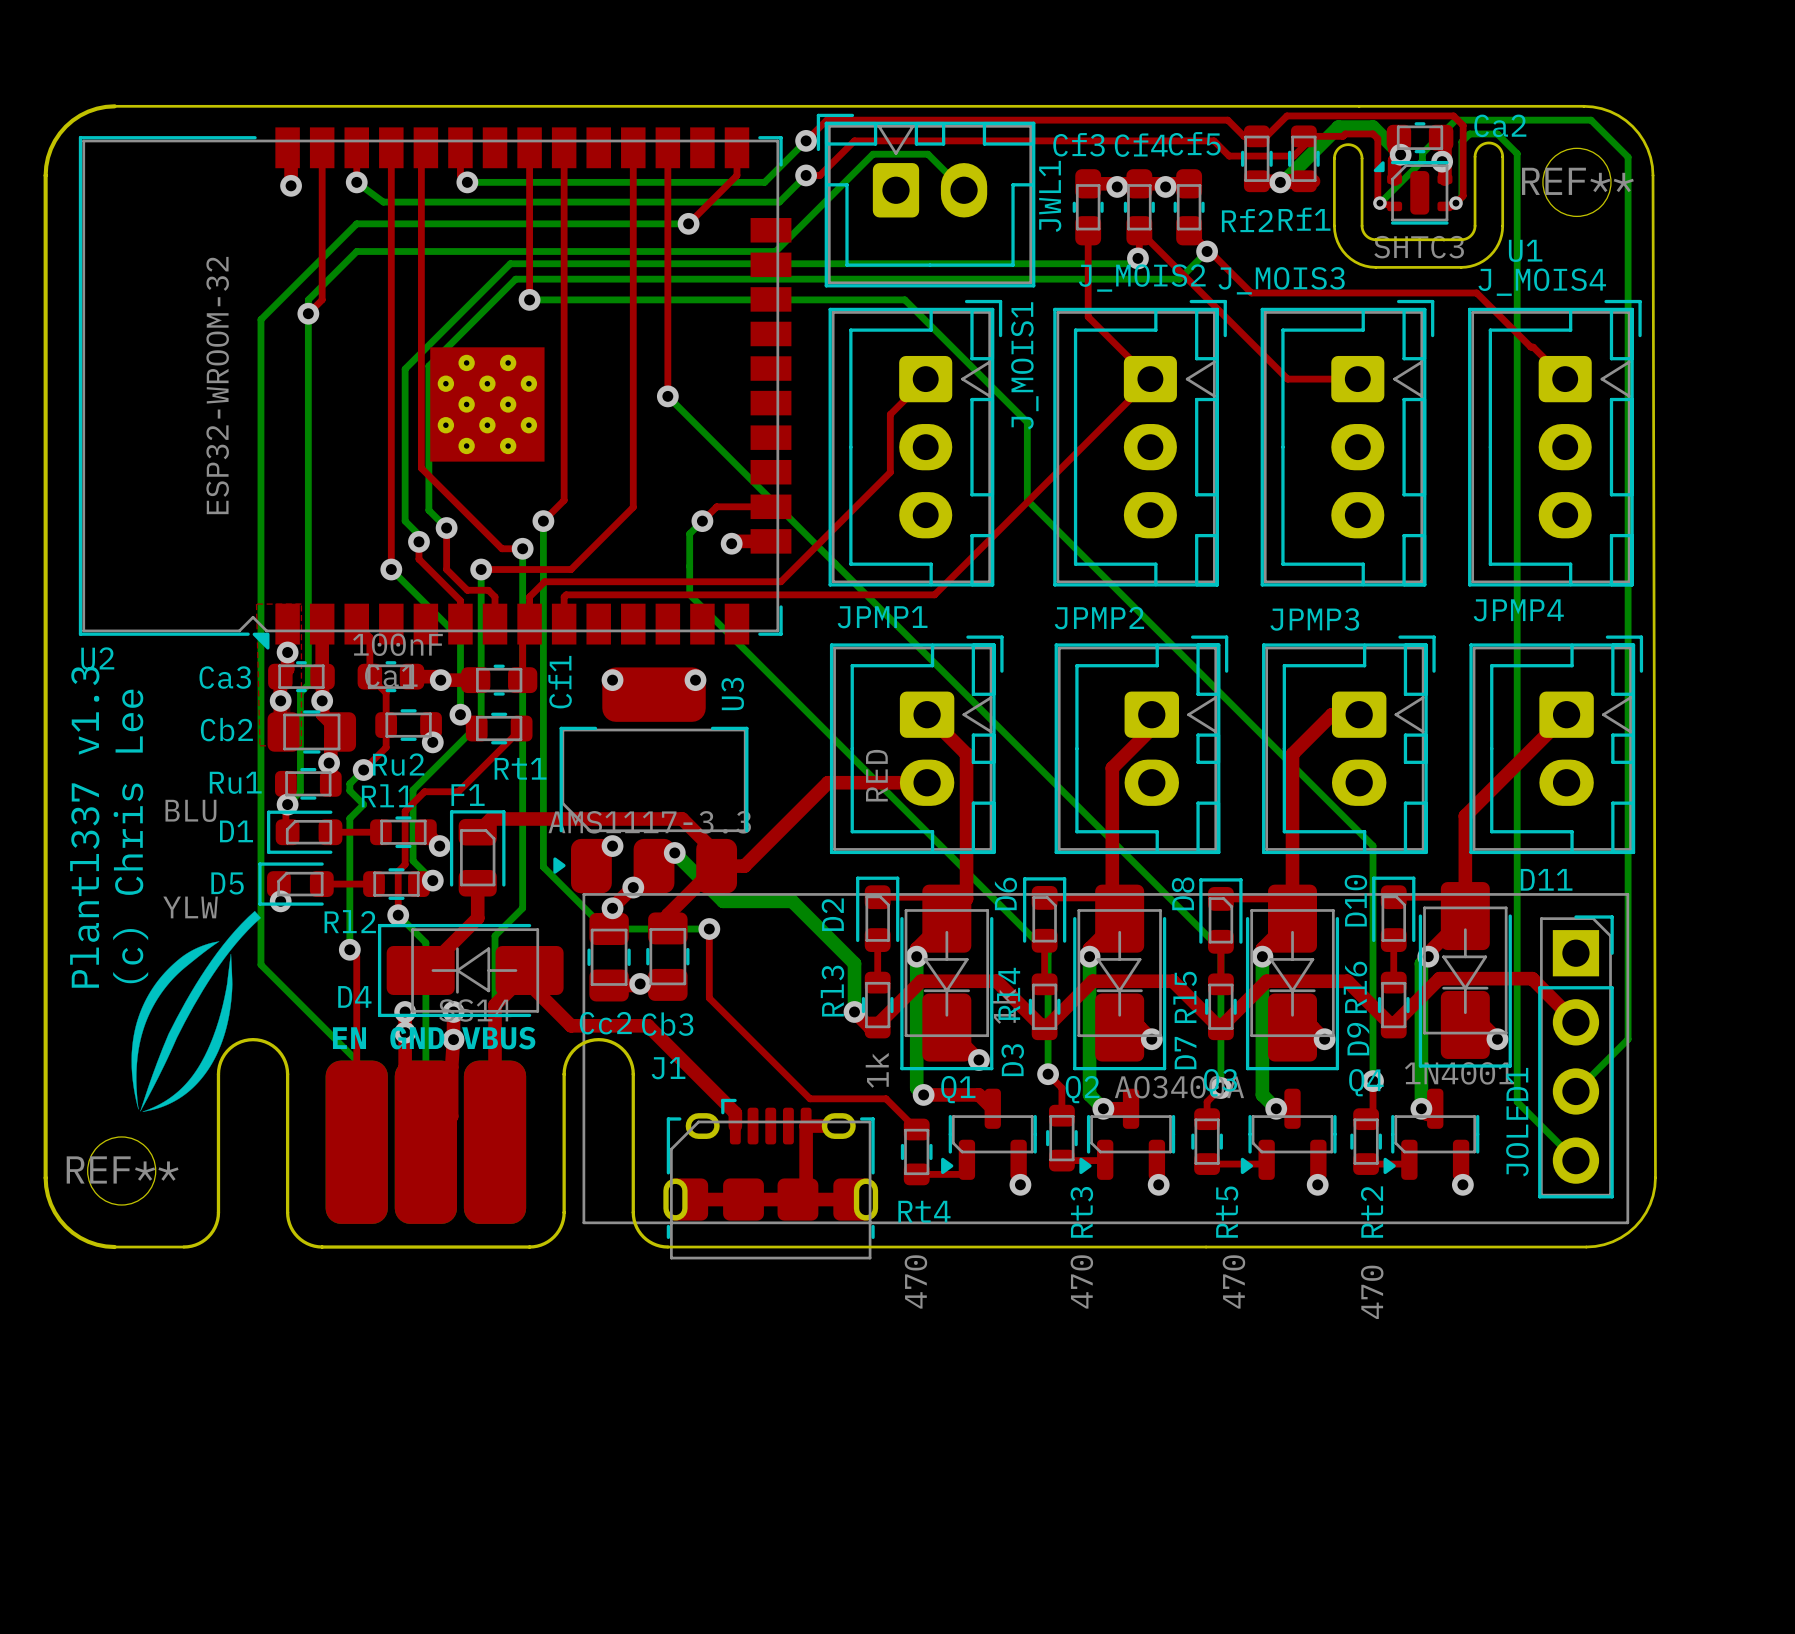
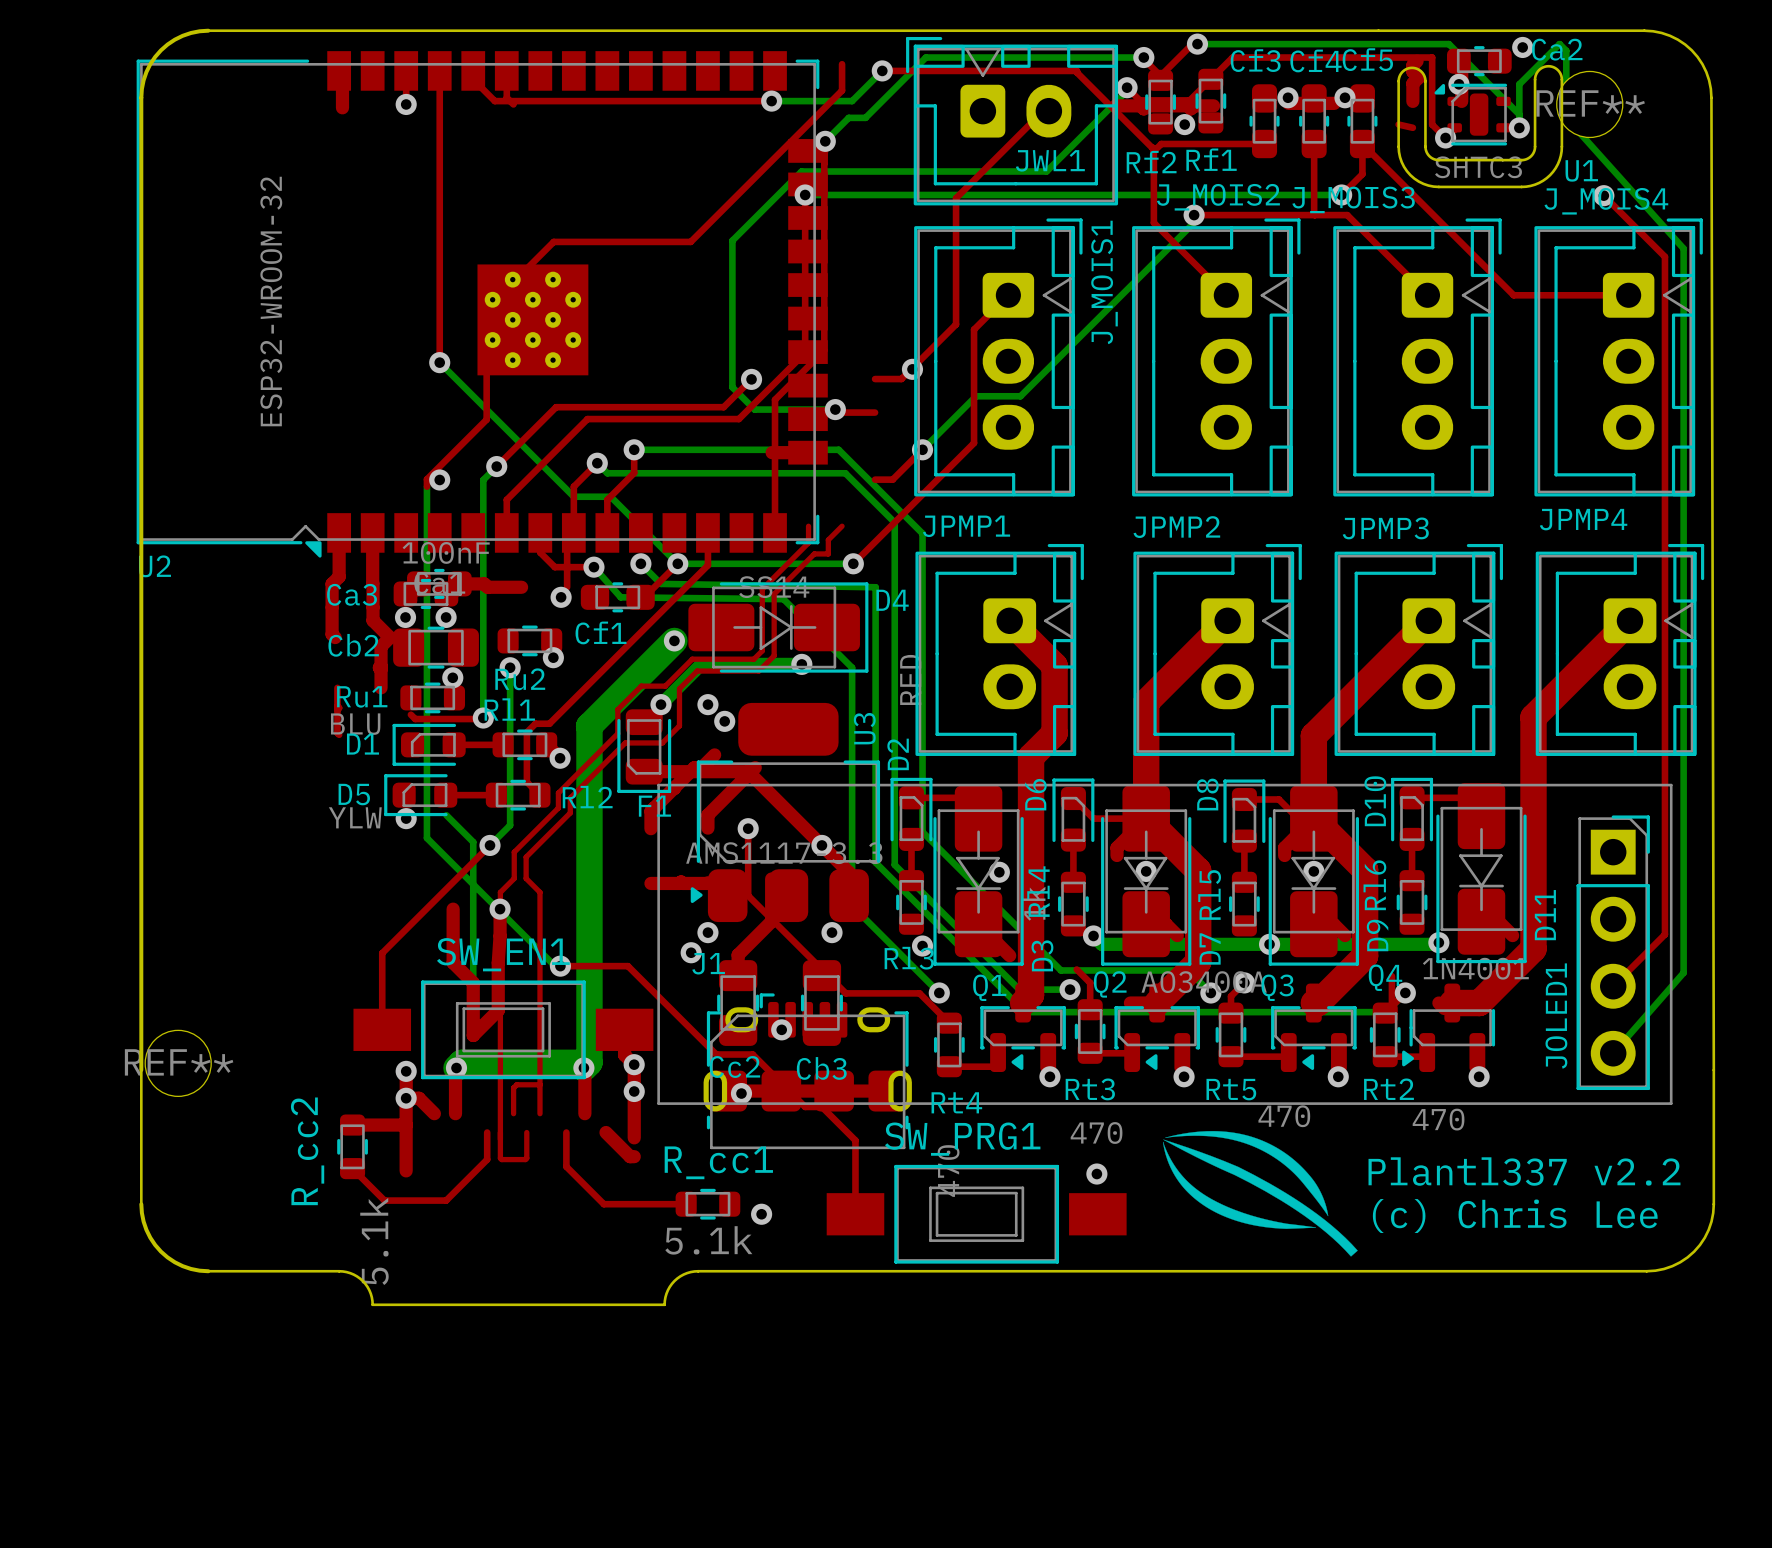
board edge: (152, 106) (105, 106) (80, 115) (59, 133) (50, 148) (46, 166) (45, 1177) (48, 1195) (54, 1212) (65, 1226) (80, 1237) (105, 1246) (183, 1247) -> none
board edge: (1583, 106) (1610, 111) (1632, 126) (1647, 148) (1653, 175) (1655, 1177) (1653, 1195) (1641, 1219) (1628, 1232) (1612, 1241) (1586, 1247) (667, 1247) -> (1596, 30) (1653, 31) (1677, 39) (1691, 50) (1702, 64) (1710, 89) (1713, 1204) (1708, 1229) (1699, 1245) (1687, 1257) (1672, 1266) (1646, 1271) (694, 1271) (680, 1276) (671, 1283) (666, 1293) (664, 1304) (372, 1304) (370, 1293) (365, 1283) (356, 1276) (346, 1272) (208, 1271) (191, 1268) (167, 1257) (155, 1245) (146, 1229) (141, 1204) (141, 97) (146, 72) (160, 50) (182, 35) (208, 30)
top track: (1167, 120) (826, 120) (806, 140) -> (1192, 44) (1160, 75) (1143, 57)
top track: (1172, 120) (1227, 120) (1244, 136) (1266, 136) (1286, 115) (1453, 115) (1463, 125) (1463, 195) (1452, 206) (1444, 206) -> none
bottom track: none -> (1197, 44) (1448, 44) (1519, 114)
via: none -> (1197, 44)
via: none -> (1522, 47)
bottom track: none -> (1143, 57) (925, 57) (865, 117) (848, 117) (825, 141)
via: none -> (1143, 57)
top track: (1345, 133) (1342, 136) (1313, 136) (1293, 156) (1229, 156) (1214, 140) (854, 140) (819, 175) (806, 175) -> (1365, 57) (1232, 57) (1189, 100) (1139, 100) (1127, 87)
top track: (1373, 133) (1377, 138) (1377, 201) -> (1391, 57) (1432, 57) (1432, 124) (1445, 137) (1454, 127) (1454, 130)
Ca2 position: (1420, 137) -> (1479, 61)
top track: none -> (473, 64) (473, 79) (494, 101) (771, 101)
top track: none -> (842, 64) (842, 90) (690, 241) (553, 241) (486, 308) (486, 419) (426, 479) (426, 486)
bottom track: (806, 140) (764, 182) (467, 182) -> none
via: (806, 140) -> none
top track: (322, 147) (322, 299) (308, 313) -> none
top track: (425, 147) (421, 152) (421, 468) (501, 548) (522, 548) -> none
top track: (529, 147) (529, 299) -> none
top track: (564, 147) (564, 500) (543, 521) -> none
top track: (633, 147) (633, 507) (571, 569) (481, 569) -> none
top track: (667, 147) (667, 396) -> none
top track: (736, 147) (736, 175) (688, 223) -> none
top track: none -> (882, 70) (1077, 70) (1153, 148) (1153, 222) (1226, 295)
bottom track: none -> (882, 70) (852, 101) (771, 101)
via: none -> (882, 70)
bottom track: (1400, 154) (1373, 127) (1338, 127) (1283, 182) (1280, 182) -> none
via: (1400, 154) -> none
Rf2 position: (1256, 158) -> (1160, 102)
Rf1 position: (1303, 158) -> (1210, 101)
via: none -> (1127, 87)
bottom track: (806, 175) (779, 202) (383, 202) (356, 182) -> none
via: (806, 175) -> none
via: none -> (1344, 97)
via: none -> (771, 101)
via: (467, 182) -> none
via position: (1280, 182) -> (1287, 97)
via: (291, 185) -> none
via: (1117, 186) -> none
via position: (1165, 186) -> (1184, 124)
top track: none -> (1048, 111) (1043, 111) (956, 198) (956, 324) (901, 379) (875, 379)
bottom track: (964, 190) (927, 154) (872, 154) (775, 251) -> (1127, 87) (1127, 91) (1046, 171) (812, 171)
U1 position: (1413, 192) -> (1472, 114)
JWL1 name rotation: 0° (1050, 196) -> 90° clockwise (1050, 160)
JWL1 position: (926, 200) -> (1012, 121)
via: (1379, 203) -> none
bottom track: (1380, 203) (1422, 160) (1422, 153) (1455, 120) (1591, 120) (1628, 157) (1628, 1039) (1575, 1091) -> none
bottom track: (1455, 203) (1461, 197) (1461, 141) (1469, 133) (1497, 133) (1517, 153) (1517, 1101) (1575, 1160) -> none
via: (1455, 203) -> none
bottom track: none -> (1519, 127) (1519, 84) (1559, 44) (1566, 50) (1566, 117) (1683, 248) (1683, 972) (1613, 1053)
via: none -> (1519, 127)
Cf3 position: (1088, 207) -> (1264, 121)
Cf4 position: (1139, 207) -> (1314, 121)
Cf5 position: (1189, 207) -> (1362, 121)
via: none -> (1445, 137)
top track: none -> (825, 141) (824, 350) (775, 399) (775, 526)
via: none -> (825, 141)
bottom track: (688, 223) (356, 223) (260, 319) (260, 964) (356, 1060) (356, 1142) -> none
via: (688, 223) -> none
top track: none -> (1264, 143) (1161, 143) (1153, 151)
top track: none -> (1314, 143) (1314, 215)
top track: (1088, 230) (1088, 316) (1150, 379) (934, 594) (566, 594) (564, 596) -> (634, 449) (634, 473) (607, 499) (607, 506)
top track: (1189, 230) (1207, 248) (1207, 251) (1209, 251) (1251, 292) (1476, 292) (1565, 379) -> none
board edge: (1421, 239) (1374, 239) (1366, 235) (1362, 225) (1361, 154) (1358, 148) (1351, 145) (1344, 145) (1338, 148) (1334, 158) (1334, 225) (1335, 236) (1342, 251) (1355, 261) (1365, 265) (1421, 267) -> (1438, 160) (1430, 157) (1425, 148) (1424, 76) (1418, 69) (1407, 68) (1402, 72) (1398, 79) (1400, 157) (1406, 171) (1414, 178) (1423, 183) (1438, 186)
board edge: (1461, 239) (1469, 236) (1474, 227) (1475, 151) (1483, 143) (1493, 143) (1499, 147) (1502, 155) (1501, 235) (1496, 247) (1487, 258) (1474, 265) (1461, 267) -> (1477, 160) (1523, 160) (1531, 156) (1535, 146) (1535, 76) (1538, 70) (1544, 66) (1551, 66) (1557, 70) (1561, 79) (1561, 146) (1559, 159) (1555, 168) (1543, 180) (1530, 185) (1477, 186)
bottom track: (764, 251) (356, 251) (308, 299) (308, 684) (300, 692) (300, 791) (287, 804) -> (801, 171) (732, 240) (732, 387) (754, 409) (835, 409)
bottom track: (1207, 251) (1179, 279) (515, 279) (428, 366) (428, 510) (446, 528) -> none
via: (1207, 251) -> none
top track: (1137, 258) (1139, 230) (1287, 379) (1357, 379) -> none
bottom track: (1137, 258) (1132, 263) (510, 263) (405, 369) (405, 521) (418, 534) (418, 541) -> none
via: (1137, 258) -> none
bottom track: none -> (805, 194) (1341, 194)
via: none -> (805, 194)
top track: none -> (1341, 194) (1362, 174) (1362, 143) (1513, 295) (1628, 295)
via: none -> (1341, 194)
top track: none -> (1603, 195) (1664, 256) (1664, 934) (1613, 986)
via: none -> (1603, 195)
top track: none -> (1194, 215) (1347, 215) (1427, 295)
bottom track: none -> (1194, 215) (1194, 222) (1020, 396) (976, 396) (922, 449)
via: none -> (1194, 215)
bottom track: (529, 299) (904, 299) (1027, 422) (1027, 500) (1373, 845) (1373, 1081) -> none
via: (529, 299) -> none
via: (308, 313) -> none
top track: (925, 379) (890, 414) (890, 472) (780, 581) (544, 581) (529, 596) -> (597, 463) (573, 486) (573, 506)
top track: none -> (1008, 295) (974, 329) (974, 443) (853, 563)
bottom track: (667, 396) (1220, 949) (1220, 1088) -> none
via: (667, 396) -> none
J_MOIS1 position: (915, 443) -> (998, 357)
J_MOIS2 position: (1140, 443) -> (1216, 357)
J_MOIS3 position: (1347, 443) -> (1417, 357)
J_MOIS4 position: (1554, 443) -> (1618, 357)
top track: (391, 448) (391, 569) -> none
bottom track: none -> (439, 362) (573, 496) (610, 496) (677, 563) (853, 563)
via: none -> (439, 362)
via: none -> (912, 369)
top track: none -> (751, 379) (723, 407) (556, 407) (496, 466)
via: none -> (751, 379)
top track: none -> (835, 409) (838, 412) (875, 412)
via: none -> (835, 409)
top track: (771, 506) (716, 506) (702, 521) -> none
bottom track: (543, 521) (543, 867) (605, 929) (709, 929) -> none
via: (543, 521) -> none
bottom track: (702, 521) (689, 533) (689, 594) (1048, 953) (1048, 1074) -> none
via: (702, 521) -> none
top track: (446, 528) (446, 569) (467, 590) (488, 590) (495, 596) (495, 617) -> none
via: (446, 528) -> none
bottom track: none -> (634, 449) (838, 449) (922, 533) (922, 832) (1060, 970) (1188, 970) (1210, 992)
via: none -> (634, 449)
top track: none -> (922, 449) (892, 479) (875, 479)
via: none -> (922, 449)
top track: (418, 541) (418, 559) (460, 600) -> (805, 191) (805, 352) (738, 419) (587, 419) (506, 499) (506, 510)
via: (418, 541) -> none
via: (731, 543) -> none
bottom track: (522, 548) (522, 908) (495, 935) (495, 1142) -> none
via: (522, 548) -> none
bottom track: none -> (597, 463) (607, 473) (845, 473) (894, 522) (894, 864) (1019, 989) (1070, 989)
via: none -> (597, 463)
bottom track: none -> (496, 466) (483, 479) (483, 718)
via: none -> (496, 466)
bottom track: (391, 569) (460, 638) (460, 714) -> none
bottom track: (481, 569) (481, 721) (413, 789) (413, 860) (432, 880) -> none
via: (481, 569) -> none
bottom track: none -> (426, 486) (426, 838) (560, 969)
top zone outline: (256, 604) (259, 745) (301, 745) (301, 604) (256, 604) -> none
top track: none -> (707, 526) (707, 565) (549, 723) (535, 723) (526, 732) (526, 782) (539, 795)
top track: none -> (808, 526) (808, 542) (762, 589) (762, 650) (753, 659) (692, 659) (665, 686) (641, 686) (617, 709) (617, 733) (558, 793) (558, 808) (514, 852) (514, 878) (500, 892) (501, 1159) (526, 1158) (526, 1132)
top track: none -> (842, 526) (828, 539) (828, 553) (814, 553) (774, 594) (774, 655) (758, 671) (697, 671) (679, 688) (679, 725) (662, 742) (625, 742) (570, 798) (570, 812) (526, 857) (526, 878) (539, 892) (539, 1113)
top track: (356, 624) (369, 637) (369, 676) (386, 692) (386, 747) (363, 770) -> none
top track: none -> (540, 532) (540, 552) (554, 567) (593, 567)
via: (287, 652) -> none
bottom track: none -> (640, 563) (661, 583) (875, 587) (875, 862) (1025, 1012) (1386, 1012) (1405, 992)
via: none -> (640, 563)
top track: none -> (677, 563) (644, 597) (640, 597)
via: none -> (677, 563)
via: none -> (853, 563)
bottom track: none -> (593, 567) (620, 597) (783, 599) (852, 667) (852, 905) (939, 992)
via: none -> (593, 567)
Ca3 position: (301, 676) -> (425, 593)
via: (440, 680) -> none
Cf1 position: (499, 680) -> (617, 597)
via: (612, 680) -> none
via: (695, 680) -> none
Cf1 name rotation: 0° (560, 682) -> 90° clockwise (601, 632)
via: none -> (561, 597)
via: (280, 700) -> none
via: (322, 700) -> none
via: none -> (405, 617)
via: none -> (446, 617)
via: (460, 714) -> none
top track: (927, 714) (966, 754) (966, 898) (916, 948) (916, 956) -> none
top track: (1151, 714) (1151, 728) (1112, 768) (1112, 911) -> none
top track: none -> (1227, 620) (1146, 702) (1146, 809)
top track: (1359, 714) (1331, 714) (1292, 754) (1292, 833) -> (1428, 620) (1313, 735)
top track: (1566, 714) (1465, 815) (1465, 916) (1424, 956) (1428, 956) (1428, 953) -> none
top track: none -> (1629, 620) (1533, 717) (1533, 948) (1479, 1003) (1452, 1003)
Ru2 position: (408, 725) -> (529, 640)
Rt1: (499, 728) -> none
top track: (521, 728) (458, 791) (424, 791) (405, 811) (405, 864) (398, 871) (398, 915) -> none
Cb2 position: (311, 731) -> (436, 647)
bottom track: none -> (674, 640) (589, 726)
via: none -> (674, 640)
via: (432, 742) -> none
JPMP1 position: (916, 744) -> (999, 649)
JPMP2 position: (1141, 744) -> (1217, 649)
JPMP3 position: (1348, 744) -> (1418, 649)
JPMP4 position: (1556, 744) -> (1619, 649)
via: none -> (553, 657)
bottom track: none -> (801, 664) (701, 664) (661, 704)
via: none -> (801, 664)
via: (329, 763) -> none
bottom track: none -> (510, 667) (510, 825) (490, 845)
via: none -> (510, 667)
bottom track: (363, 770) (349, 783) (349, 790) (363, 804) (349, 818) (349, 949) -> none
via: (363, 770) -> none
via: none -> (452, 677)
U3 position: (650, 780) -> (785, 812)
top track: (927, 782) (827, 782) (744, 866) (716, 866) (716, 853) (682, 818) (490, 818) (477, 832) -> none
Ru1 position: (308, 783) -> (432, 697)
via: none -> (661, 704)
via: none -> (707, 704)
via: (287, 804) -> none
D1 value position: BLU (190, 810) -> BLU (355, 724)
top track: none -> (410, 714) (415, 719) (483, 718)
via: none -> (724, 721)
bottom track: none -> (589, 726) (589, 1062) (583, 1068)
text: Plantl337 v1.3 (84, 827) -> none
D1 position: (304, 832) -> (429, 744)
top track: (330, 832) (380, 832) -> (454, 744) (503, 744)
Rl1 position: (403, 832) -> (524, 744)
top track width: thin (1292, 833) (1292, 909) -> thick (1313, 735) (1313, 809)
text: (c) Chris Lee (130, 836) -> none
via position: (439, 846) -> (483, 718)
via: (612, 846) -> none
bottom track: (674, 852) (723, 901) (792, 901) (854, 963) (854, 1011) -> none
via: (674, 852) -> none
F1 rotation: 0° (477, 853) -> 180° (644, 751)
F1 position: (477, 853) -> (644, 751)
via: none -> (560, 758)
top track: none -> (644, 771) (748, 771) (849, 872) (849, 895)
D11 name rotation: 0° (1546, 879) -> 90° counterclockwise (1545, 915)
D11 name position: D11 (1546, 879) -> D11 (1545, 915)
via: (432, 880) -> none
top track: (477, 883) (477, 918) (425, 970) (420, 970) -> none
D5 position: (296, 884) -> (420, 795)
top track: (321, 884) (374, 884) -> (445, 795) (496, 795)
Rl2 position: (396, 884) -> (518, 795)
via: (633, 887) -> none
line: (583, 894) (1627, 894) (1627, 1222) (583, 1222) (583, 894) -> (658, 785) (1671, 785) (1671, 1103) (658, 1103) (658, 785)
top track: (1044, 897) (1098, 897) -> (1073, 798) (1093, 818) (1146, 818) (1198, 870) (1198, 962) (1157, 1003)
top track: (1256, 898) (1272, 898) -> (1278, 799) (1298, 818) (1313, 818) (1365, 869) (1365, 956) (1318, 1003) (1313, 1003)
via: (280, 901) -> none
D5 value position: YLW (190, 907) -> YLW (355, 817)
via: (612, 908) -> none
drawing: [131, 910, 261, 1112] -> none
D2 name position: D2 (832, 914) -> D2 (898, 754)
via: (398, 915) -> none
via: none -> (406, 818)
Rl2 name position: Rl2 (350, 921) -> Rl2 (587, 797)
top track: none -> (490, 845) (382, 953) (382, 1029)
via: none -> (490, 845)
via: none -> (821, 845)
top track: (349, 949) (356, 956) (356, 1142) -> none
via: (349, 949) -> none
Cb3 position: (667, 956) -> (821, 1003)
bottom track: (916, 956) (916, 1088) (923, 1094) -> none
via: (916, 956) -> none
bottom track: (1089, 956) (1089, 1094) (1103, 1108) -> none
via position: (1089, 956) -> (1146, 871)
bottom track: (1262, 956) (1262, 1094) (1276, 1108) -> none
via position: (1262, 956) -> (1313, 871)
bottom track: (1428, 956) (1421, 963) (1421, 1108) -> none
via: (1428, 956) -> none
Cc2 position: (609, 957) -> (738, 1003)
D4 rotation: 0° (470, 970) -> 180° (778, 627)
D4 position: (470, 970) -> (778, 627)
via: none -> (999, 872)
top track: none -> (771, 878) (771, 921) (738, 954) (738, 975)
via: (640, 983) -> none
Rl3 name rotation: 0° (832, 991) -> 90° clockwise (909, 958)
Rl3 name position: Rl3 (832, 991) -> Rl3 (909, 958)
via: (405, 1011) -> none
top track: (854, 1011) (870, 1027) (877, 1027) (877, 1024) (921, 981) (996, 981) (1044, 1029) (1092, 981) (1172, 981) (1220, 1029) (1220, 1027) (1266, 981) (1347, 981) (1393, 1027) (1393, 1024) (1439, 978) (1532, 978) (1575, 1022) -> none
via: (854, 1011) -> none
via: (405, 1032) -> none
via: none -> (707, 932)
via: none -> (832, 932)
text: EN (349, 1038) -> none
text: GND (417, 1038) -> none
text: VBUS (498, 1038) -> none
via: (453, 1039) -> none
bottom track: none -> (1093, 935) (1101, 944) (1437, 944)
via: none -> (1093, 935)
via: (1151, 1039) -> none
via: (1324, 1039) -> none
via: (1497, 1039) -> none
via: none -> (1438, 942)
via: none -> (1269, 944)
via: none -> (922, 946)
via: none -> (691, 952)
JOLED1 position: (1575, 1056) -> (1613, 952)
via: (978, 1059) -> none
top track: none -> (560, 966) (627, 966) (716, 1054) (752, 1054) (805, 1106) (821, 1106) (855, 1140) (855, 1214)
via: none -> (560, 966)
Rl3 value: 1k (877, 1070) -> none
via position: (1048, 1074) -> (1070, 989)
via position: (1373, 1081) -> (1405, 992)
Q1 footprint: [941, 1088, 1037, 1180] -> [980, 983, 1066, 1072]
Q2 footprint: [1079, 1088, 1176, 1180] -> [1114, 983, 1201, 1072]
Q3 footprint: [1240, 1088, 1337, 1180] -> [1271, 983, 1357, 1072]
top track: (923, 1094) (978, 1094) (992, 1108) -> (1009, 620) (1054, 665) (1054, 733) (1031, 756) (1031, 995) (1023, 1003)
via position: (923, 1094) -> (939, 992)
via: none -> (1210, 992)
via: (1103, 1108) -> none
via: (1276, 1108) -> none
via: (1421, 1108) -> none
top track: (735, 1126) (735, 1113) (648, 1025) (571, 1025) (529, 984) (529, 970) (495, 1005) (495, 1142) -> none
top track: (838, 1126) (806, 1126) (806, 1191) (797, 1199) -> none
SW_EN1: none -> (503, 1029)
top track: none -> (624, 1029) (624, 1055) (634, 1064) (634, 1137)
via: none -> (781, 1029)
part: (425, 1143) -> none
bottom track: none -> (589, 1062) (461, 1062) (456, 1068)
via: none -> (634, 1064)
top track: none -> (456, 1068) (455, 1113)
via: none -> (456, 1068)
top track: none -> (583, 1068) (584, 1113)
via: none -> (583, 1068)
via: none -> (406, 1071)
top track: none -> (539, 1084) (516, 1084) (513, 1087) (513, 1113)
via: none -> (634, 1091)
via: none -> (741, 1093)
top track: none -> (406, 1098) (418, 1098) (434, 1113)
via: none -> (406, 1098)
Rt3 name rotation: 0° (1081, 1212) -> 90° clockwise (1090, 1089)
Rt5 name rotation: 0° (1227, 1212) -> 90° clockwise (1231, 1089)
Rt2 name rotation: 0° (1372, 1212) -> 90° clockwise (1388, 1089)
top track: none -> (352, 1125) (406, 1125)
drawing: none -> [1163, 1131, 1358, 1257]
top track: none -> (487, 1132) (487, 1159) (446, 1200) (384, 1200) (352, 1168)
top track: none -> (566, 1132) (566, 1166) (603, 1204) (686, 1204)
top track: none -> (605, 1132) (630, 1156) (634, 1156)
R_cc2: none -> 5.1k (352, 1146)
Rt3 value rotation: 0° (1081, 1281) -> 90° clockwise (1096, 1132)
Rt5 value rotation: 0° (1233, 1281) -> 90° clockwise (1284, 1116)
text: none -> Plantl337 v2.2 (1524, 1171)
via: none -> (1096, 1174)
Rt2 value rotation: 0° (1372, 1292) -> 90° clockwise (1438, 1119)
Rt2 value position: 470 (1372, 1292) -> 470 (1438, 1119)
R_cc1: none -> 5.1k (707, 1204)
via: none -> (761, 1214)
SW_PRG1: none -> (976, 1214)
text: none -> (c) Chris Lee (1515, 1216)

